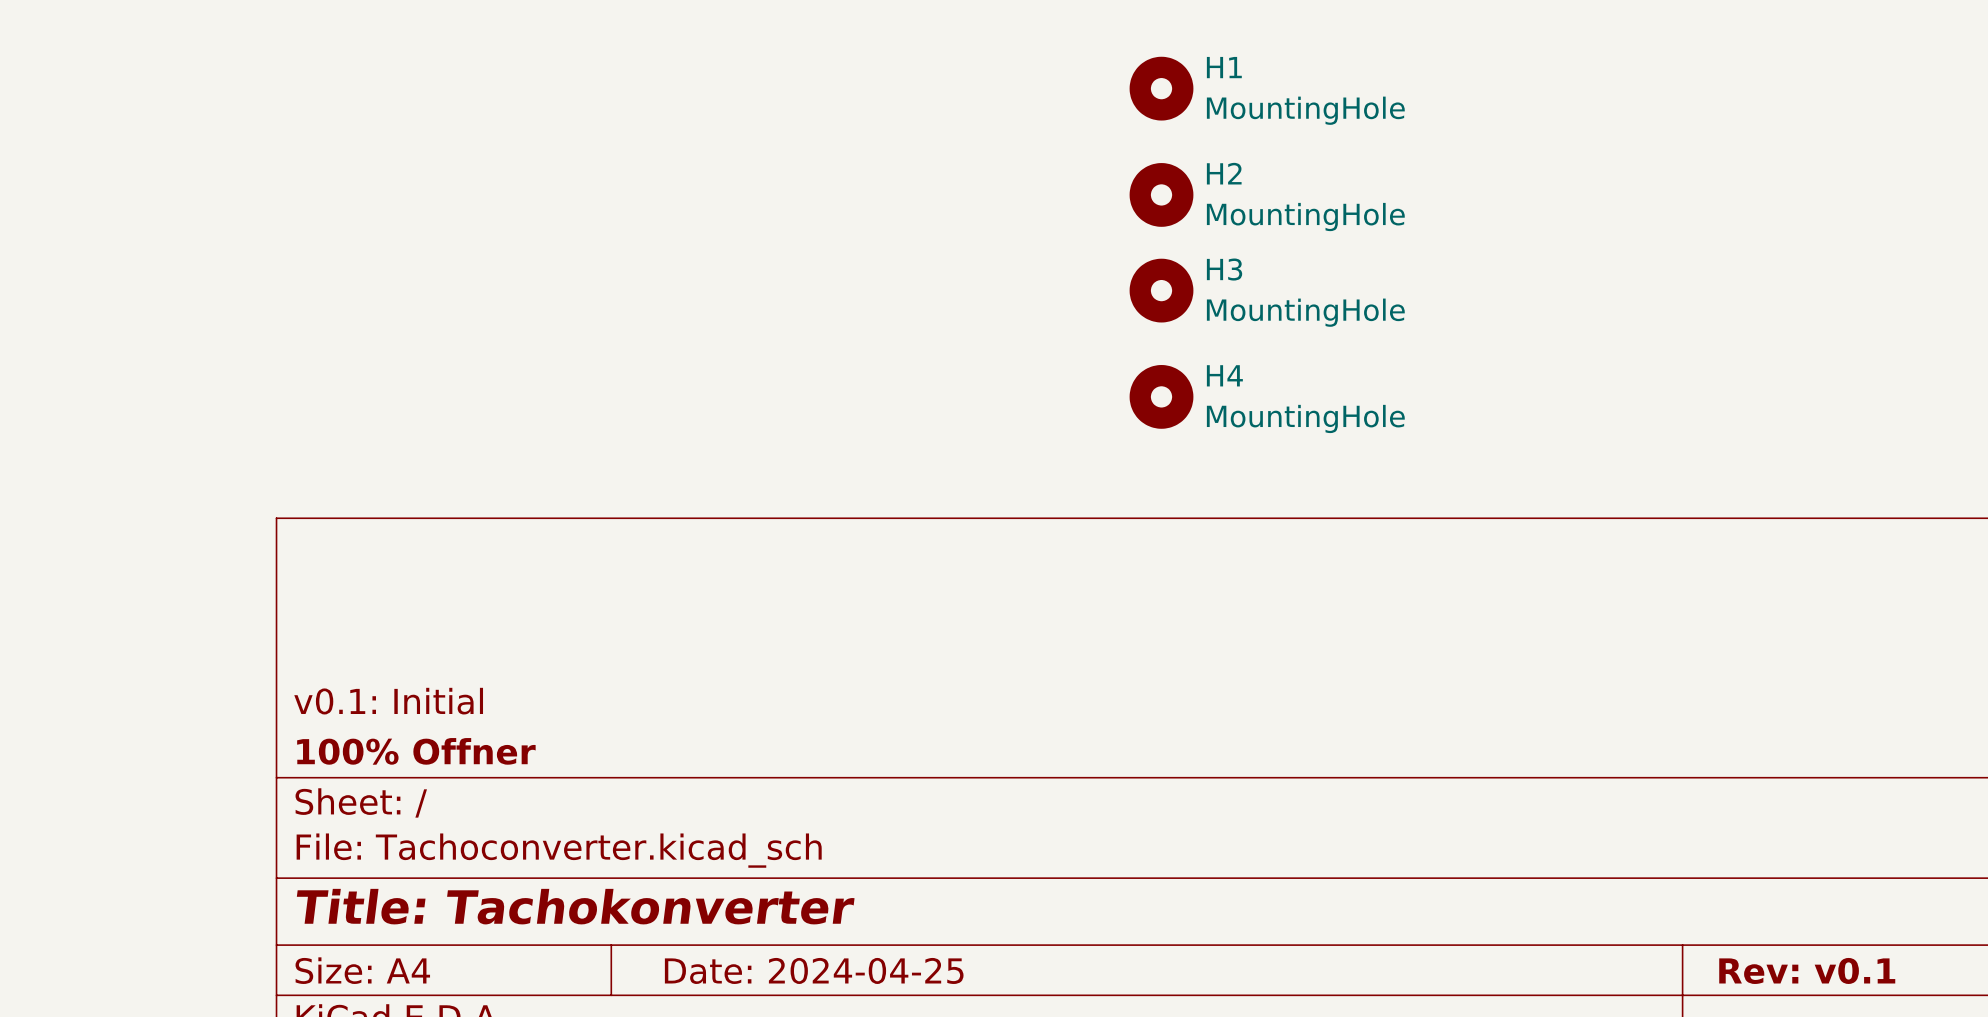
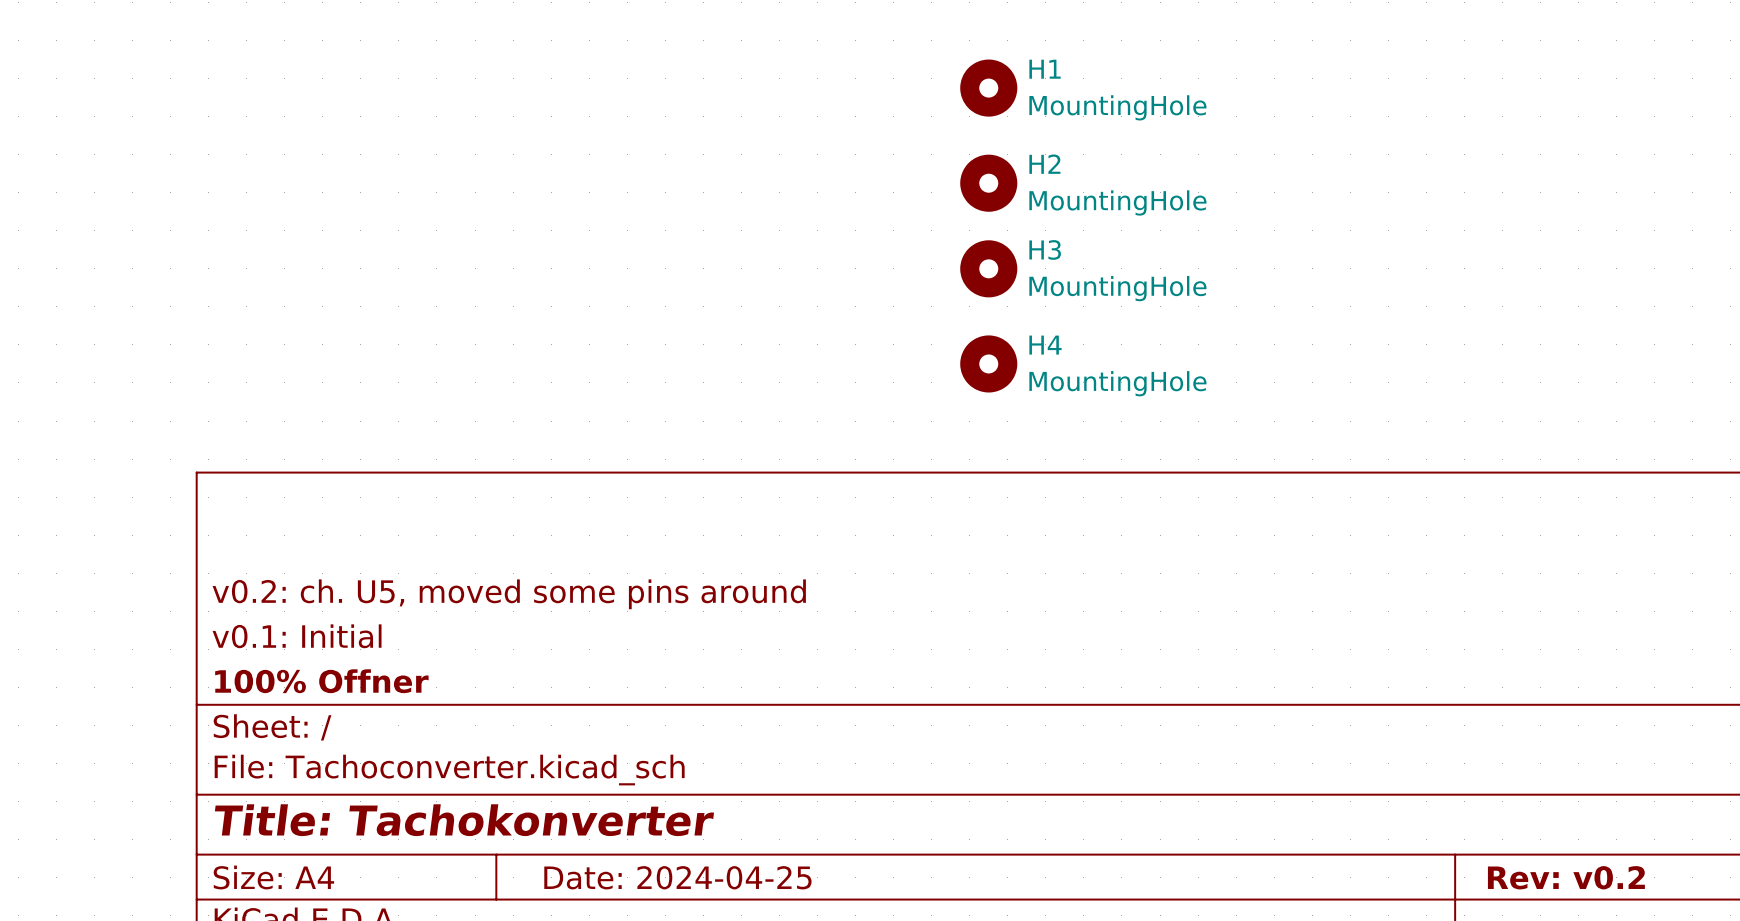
title block: none -> v0.2: ch. U5, moved some pins around (509, 594)
title block: Rev: v0.1 (1807, 970) -> Rev: v0.2 (1566, 877)

